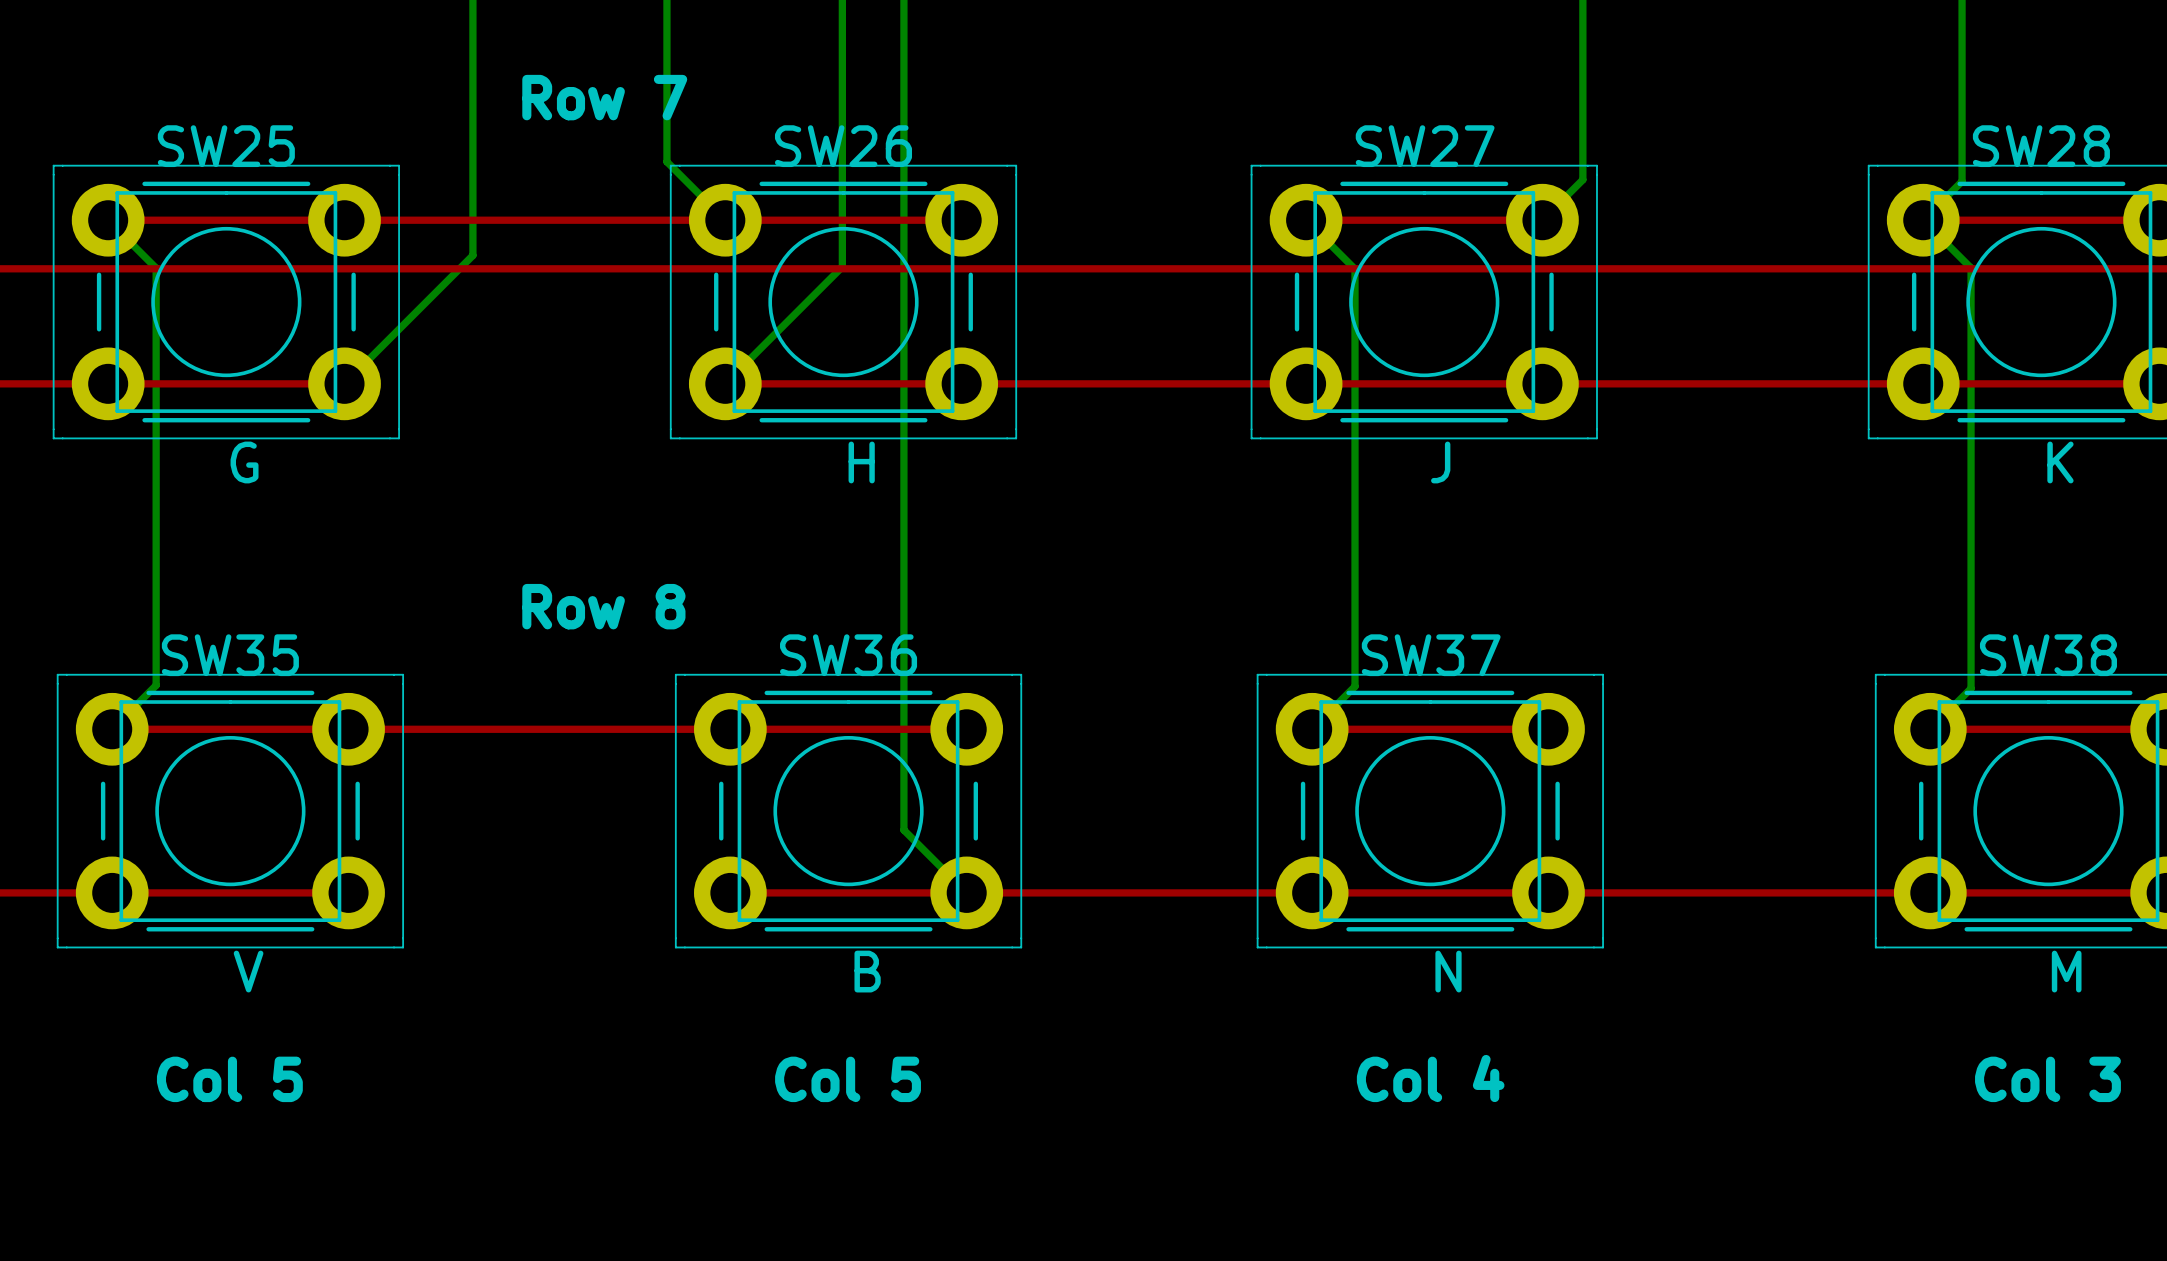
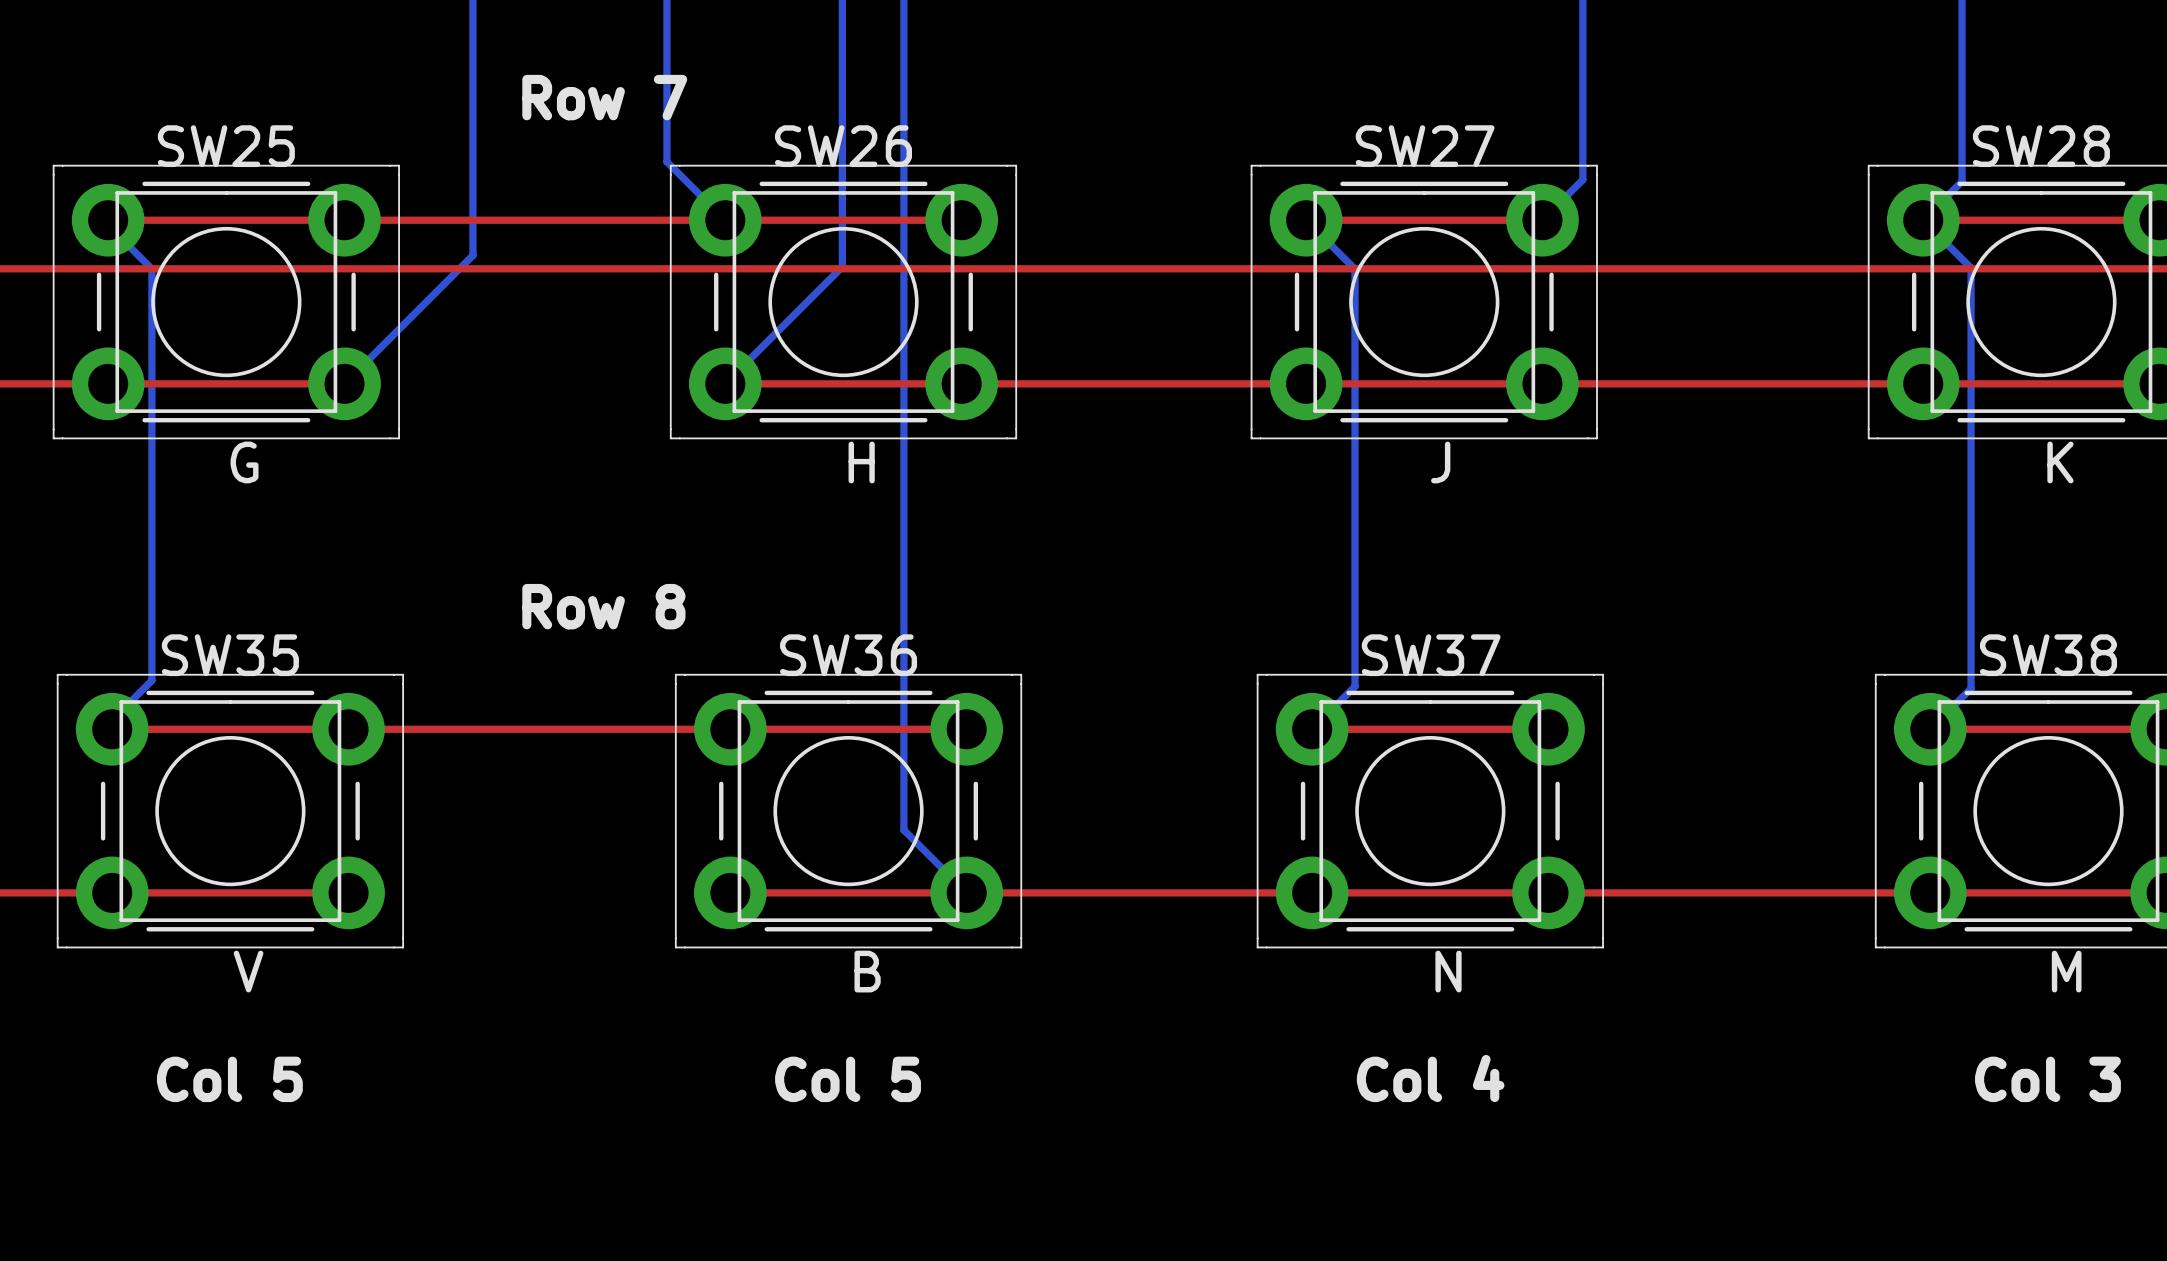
bottom track: none -> (103, 220) (151, 269) (151, 680) (103, 729)
bottom track: (108, 220) (156, 268) (156, 685) (112, 729) -> none

